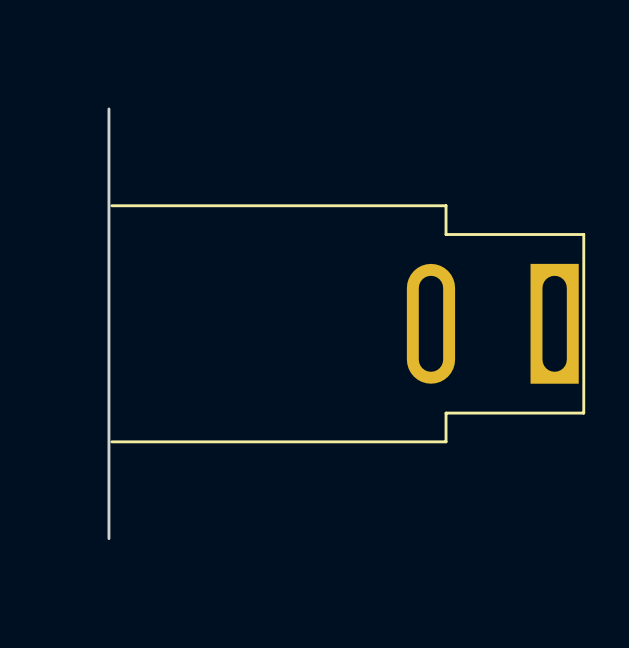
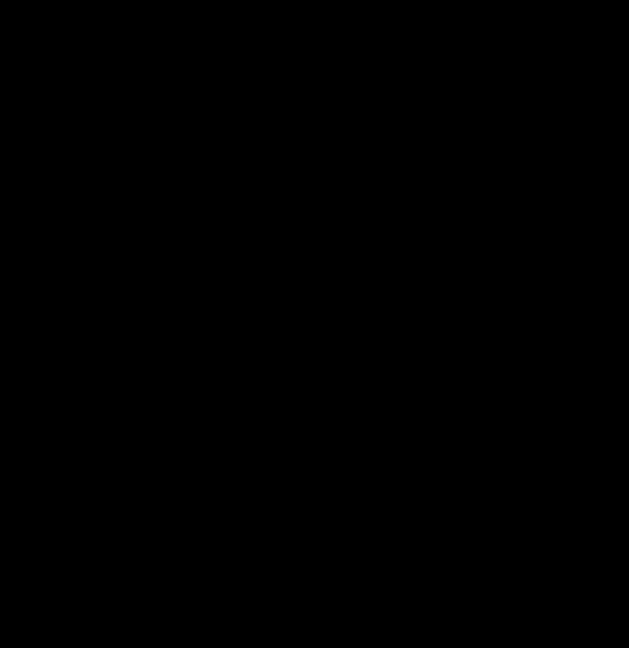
part: (346, 323) -> none

